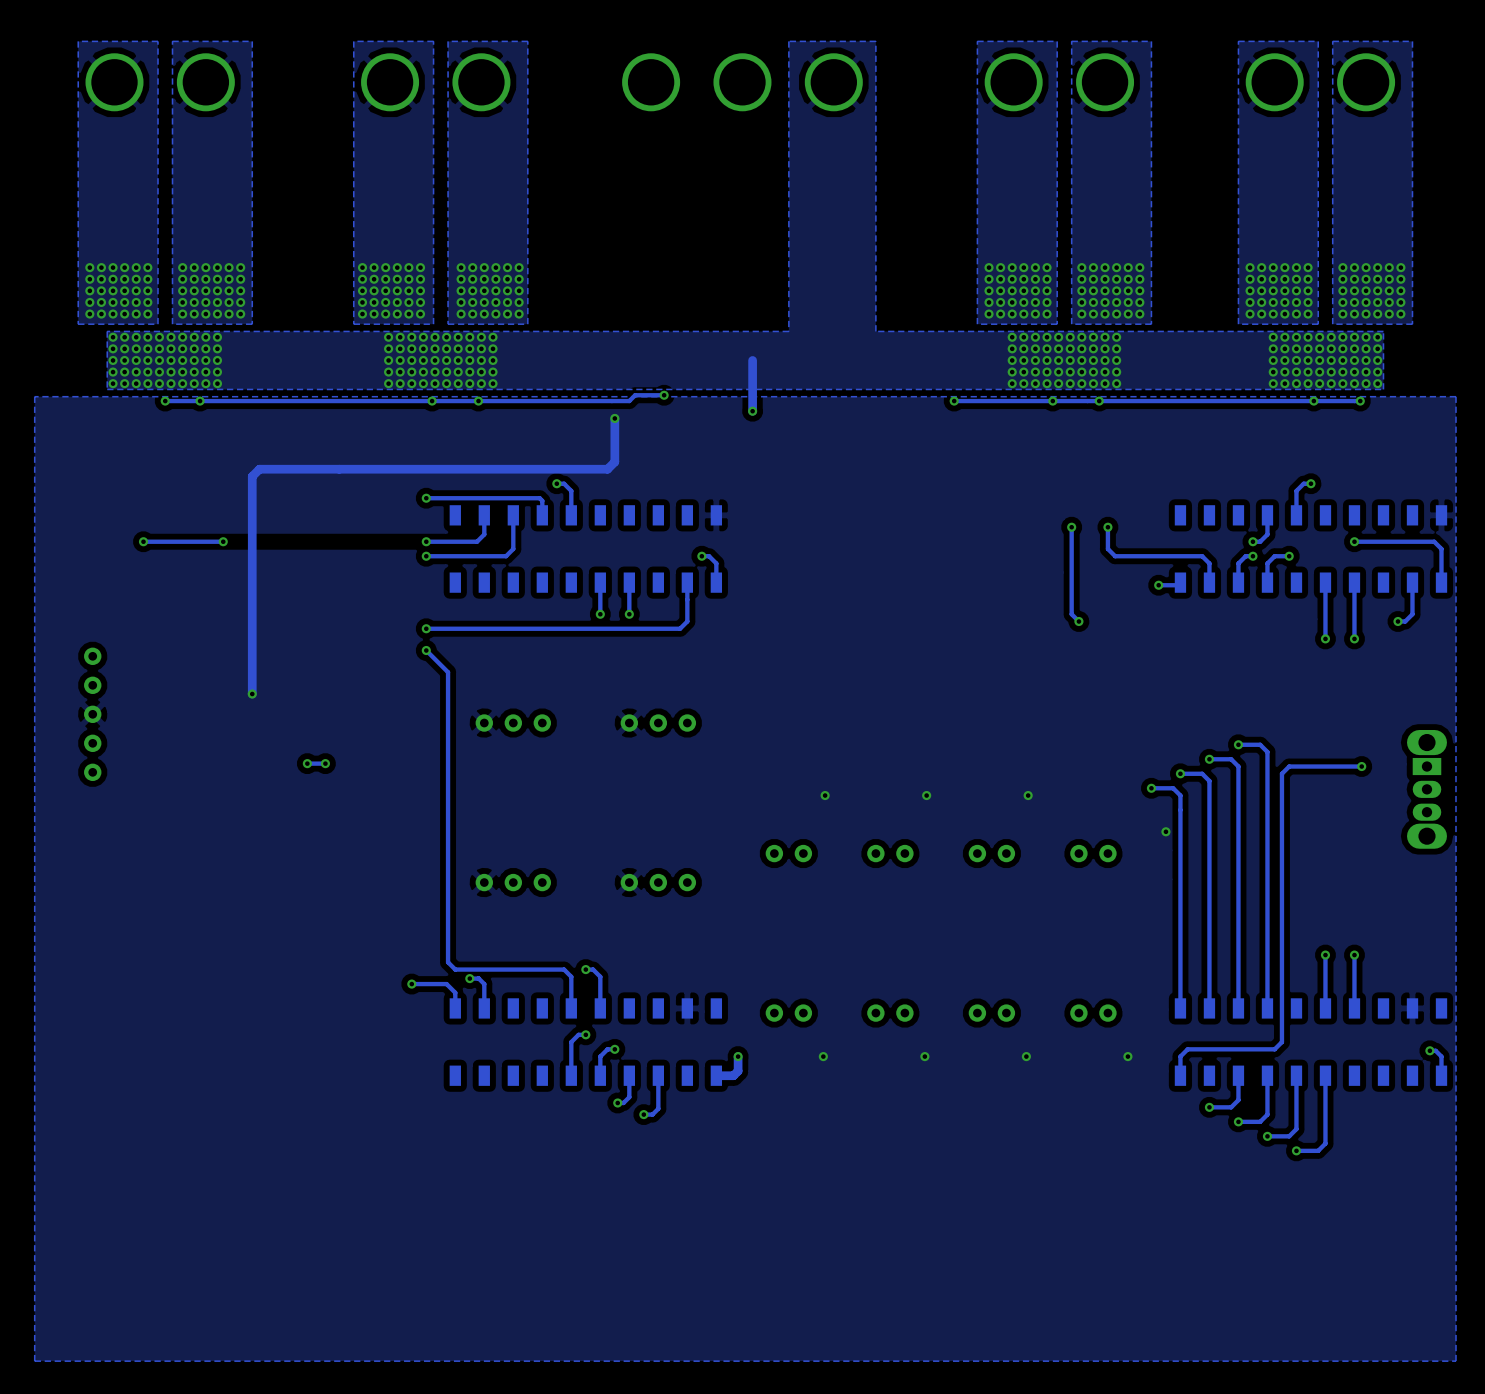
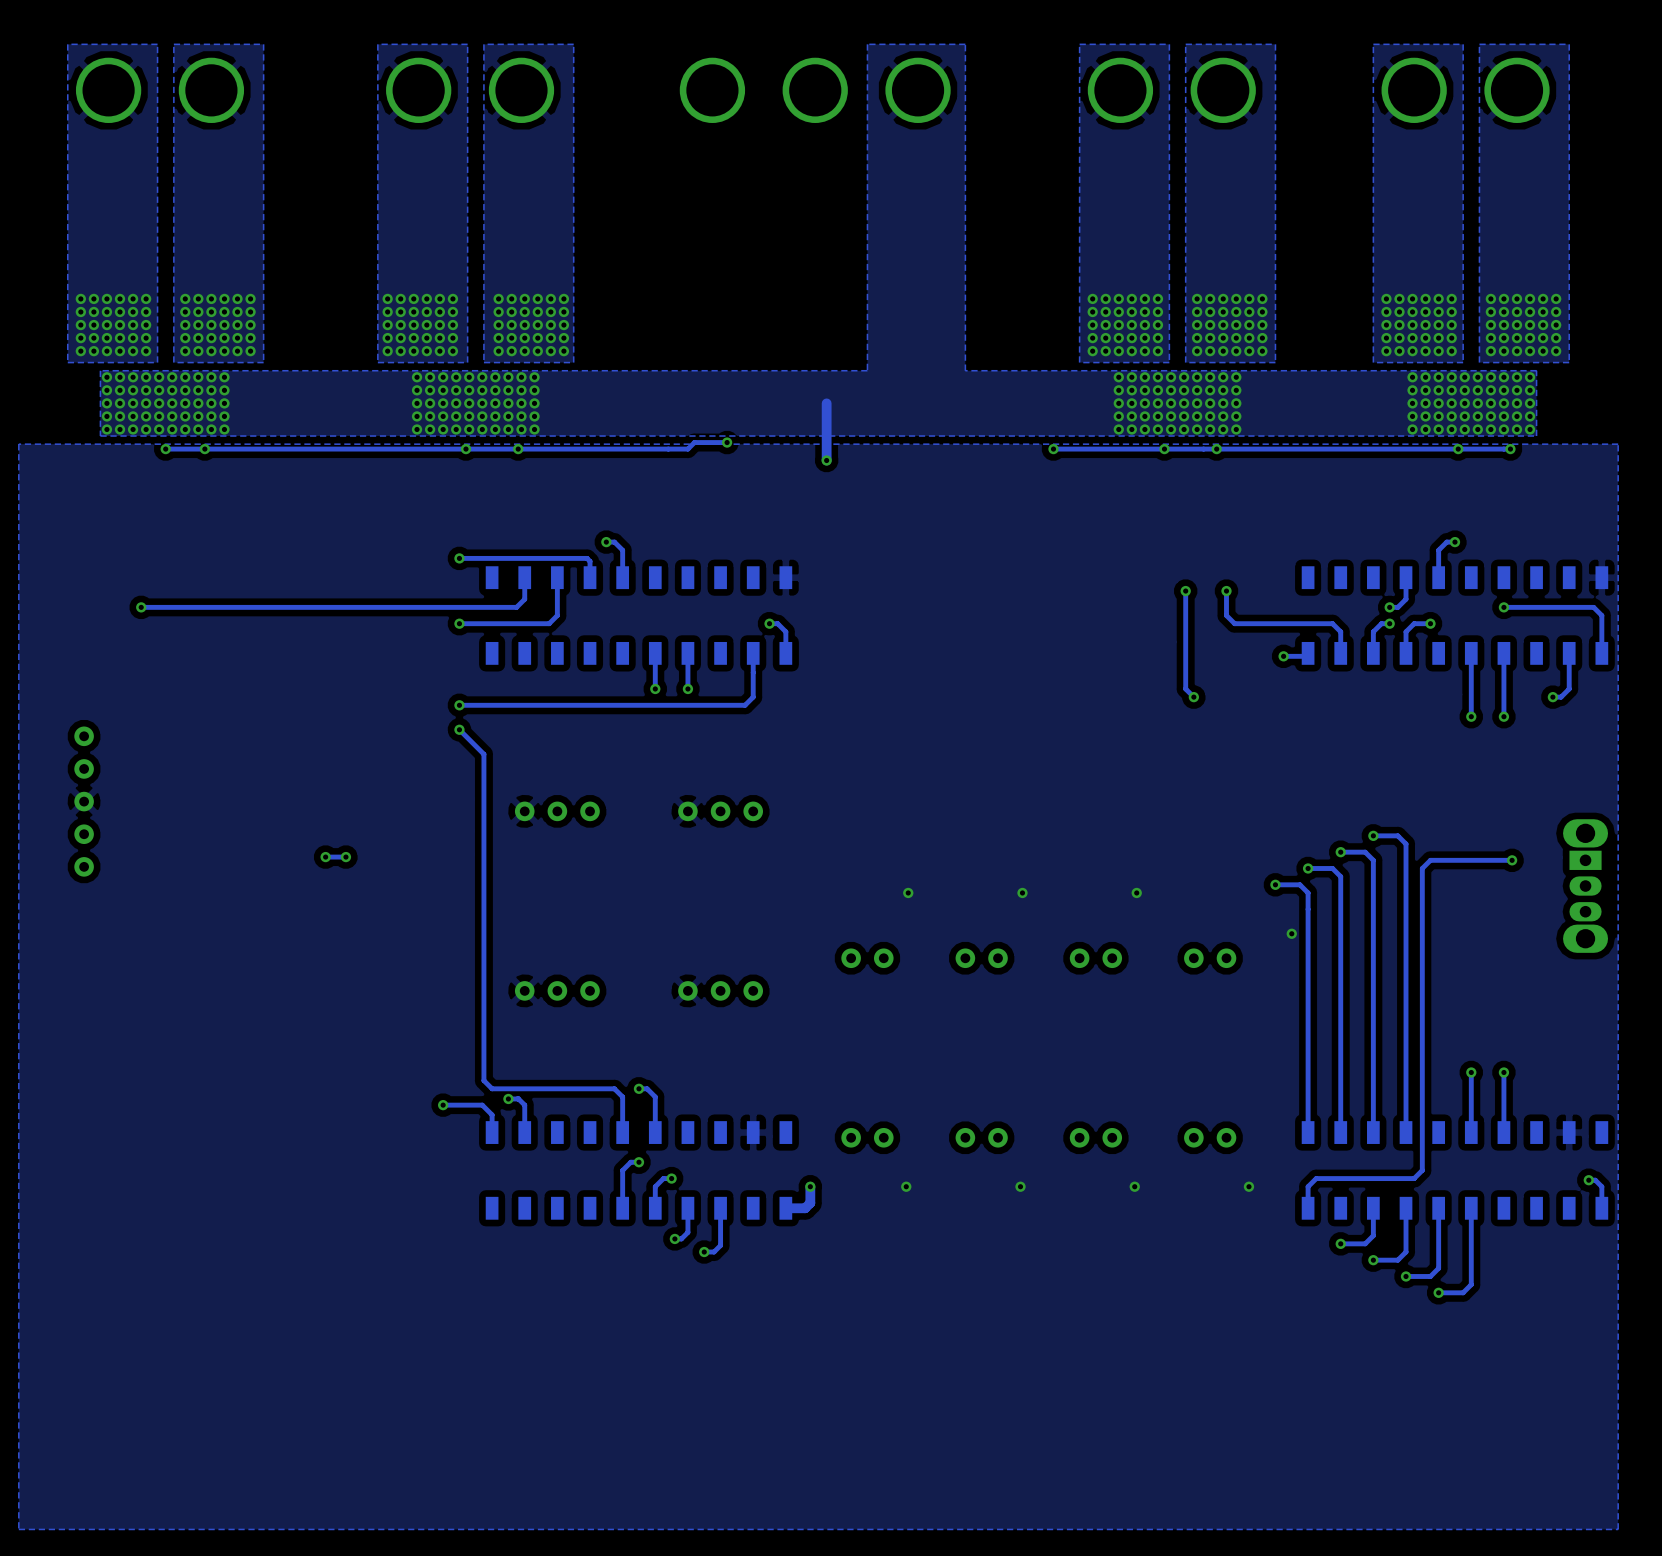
track: (614, 418) (614, 461) (607, 469) (259, 469) (252, 476) (252, 694) -> none
via: (614, 418) -> none
via: (223, 541) -> none
track: none -> (459, 607) (230, 607)
via: (426, 541) -> none
via: (252, 694) -> none

